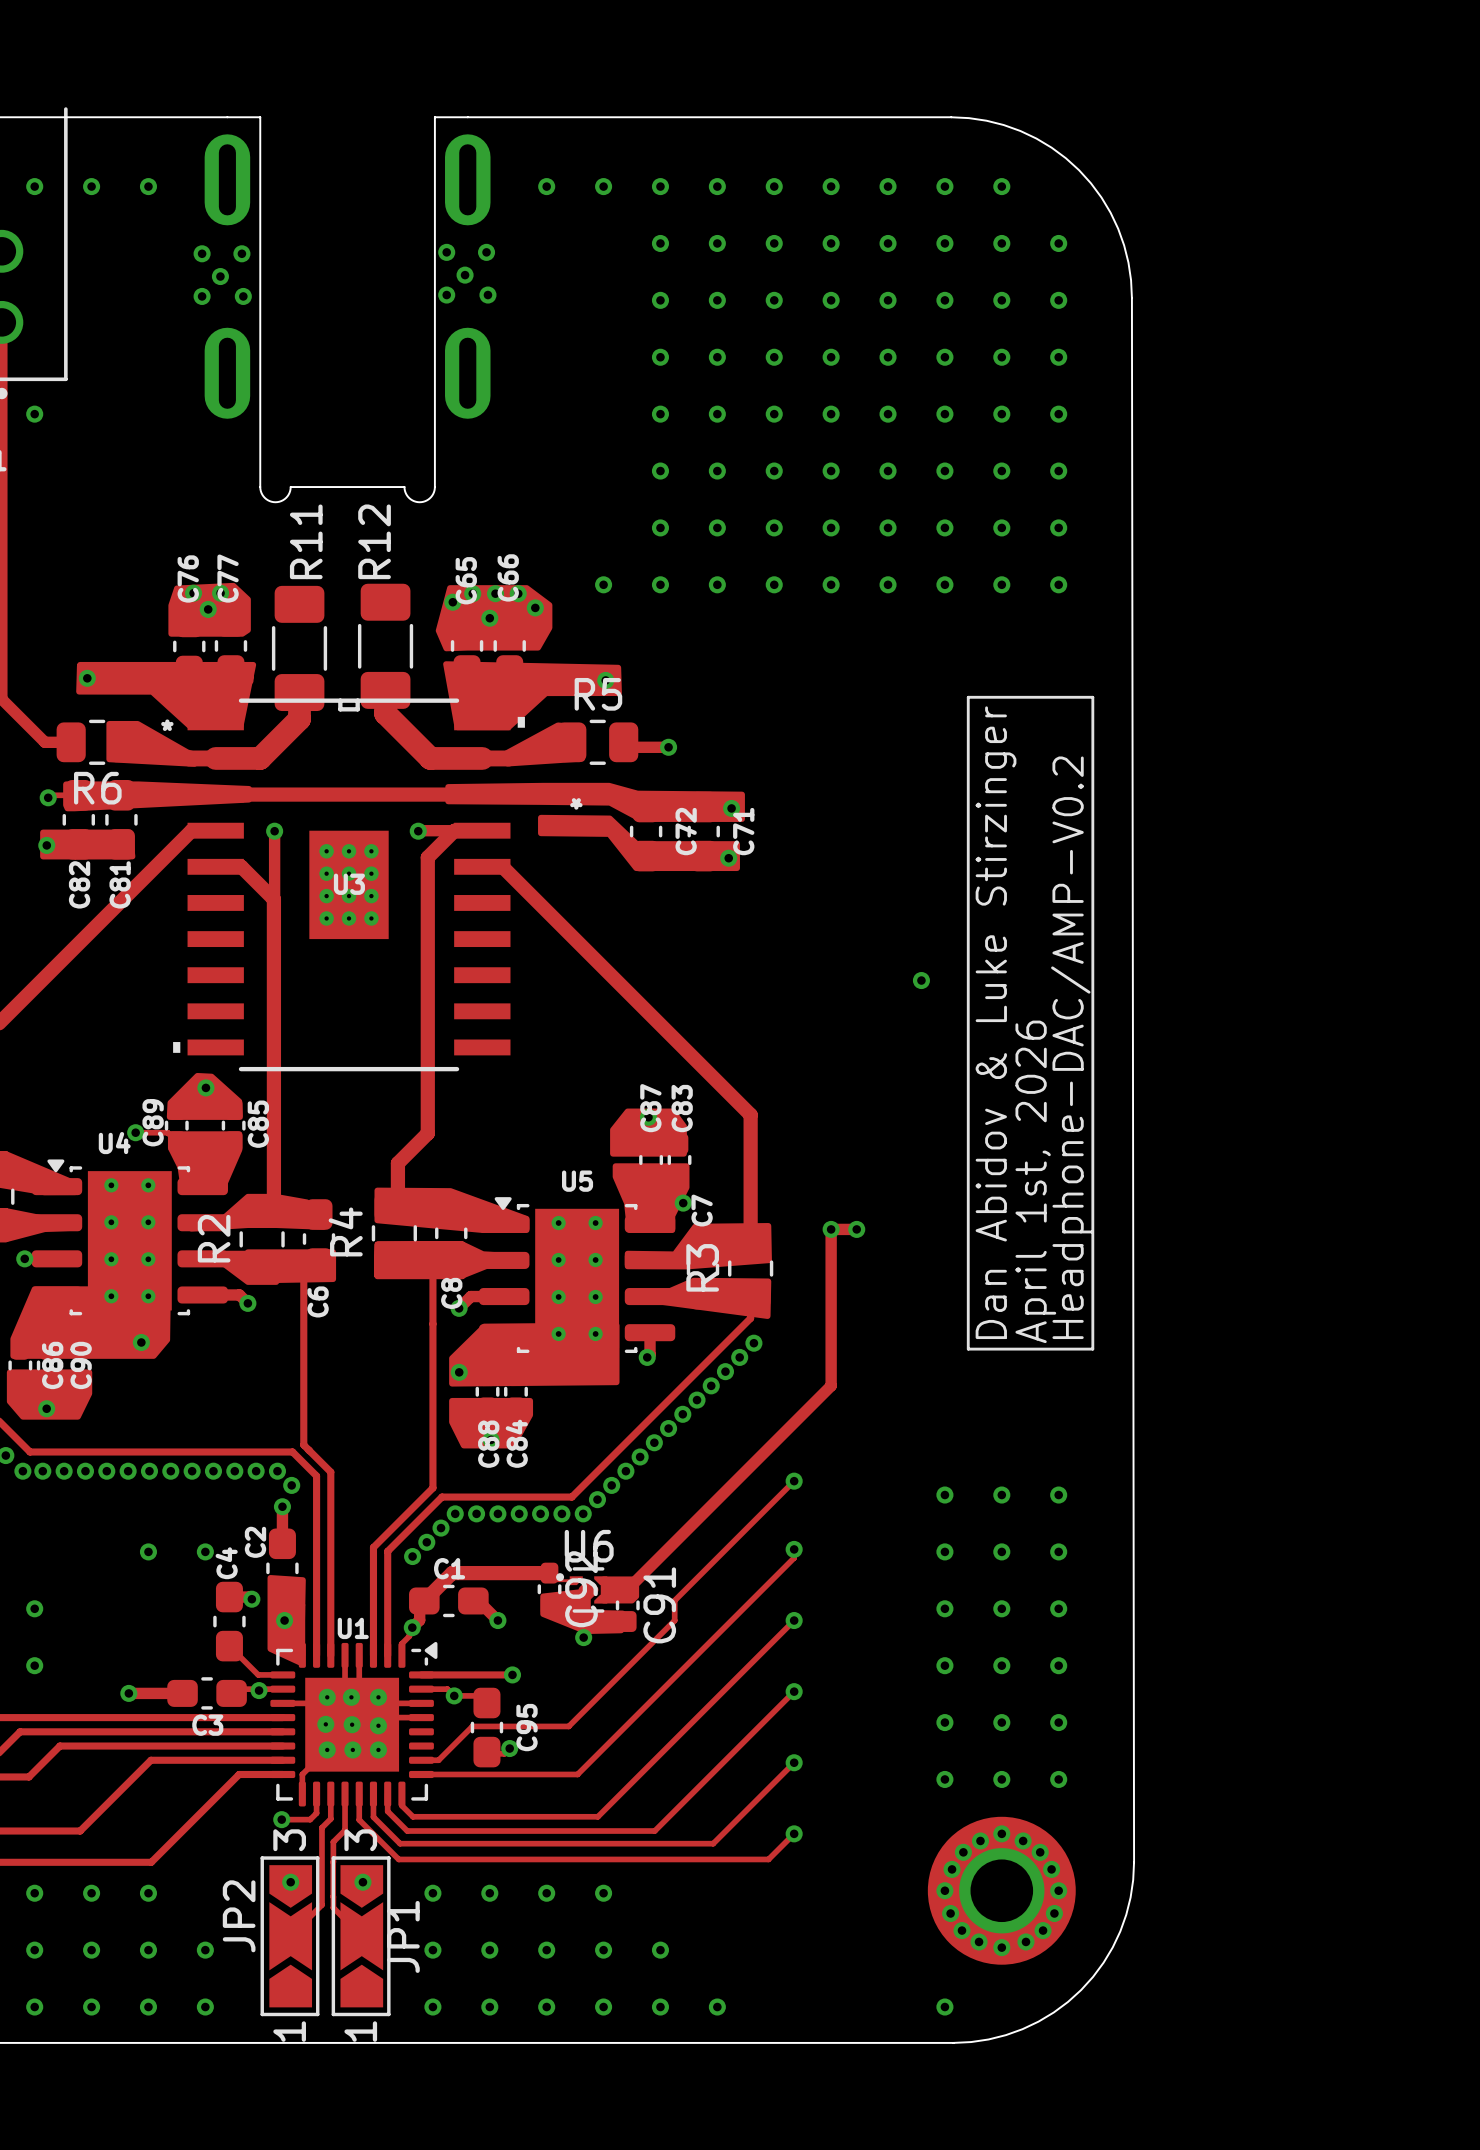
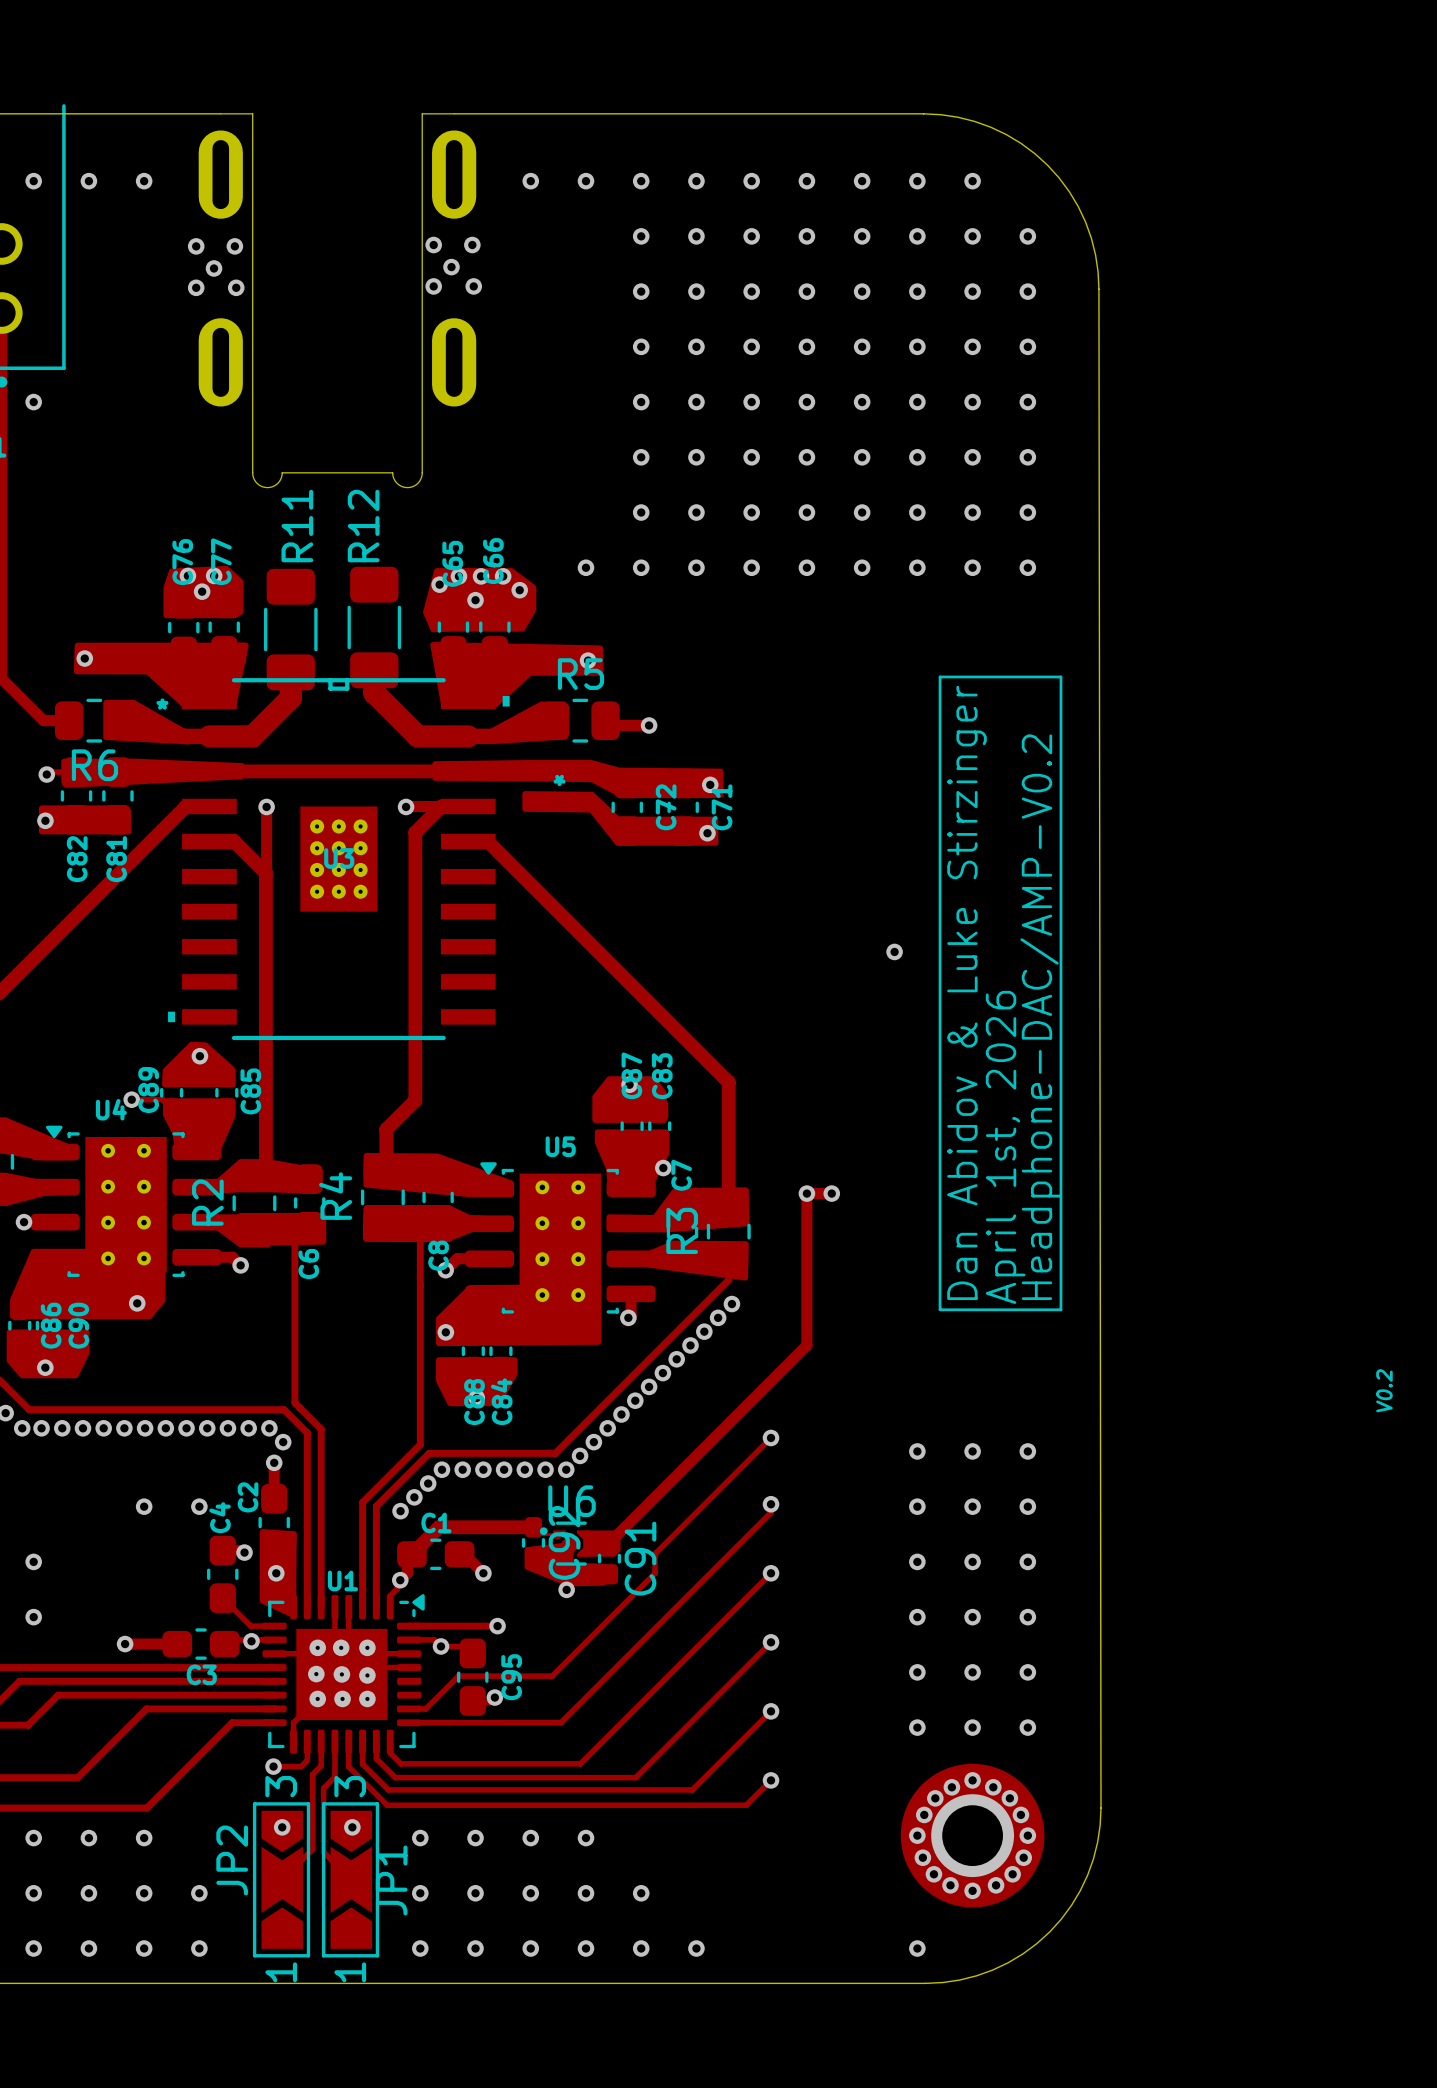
text: none -> V0.2 (1384, 1390)

